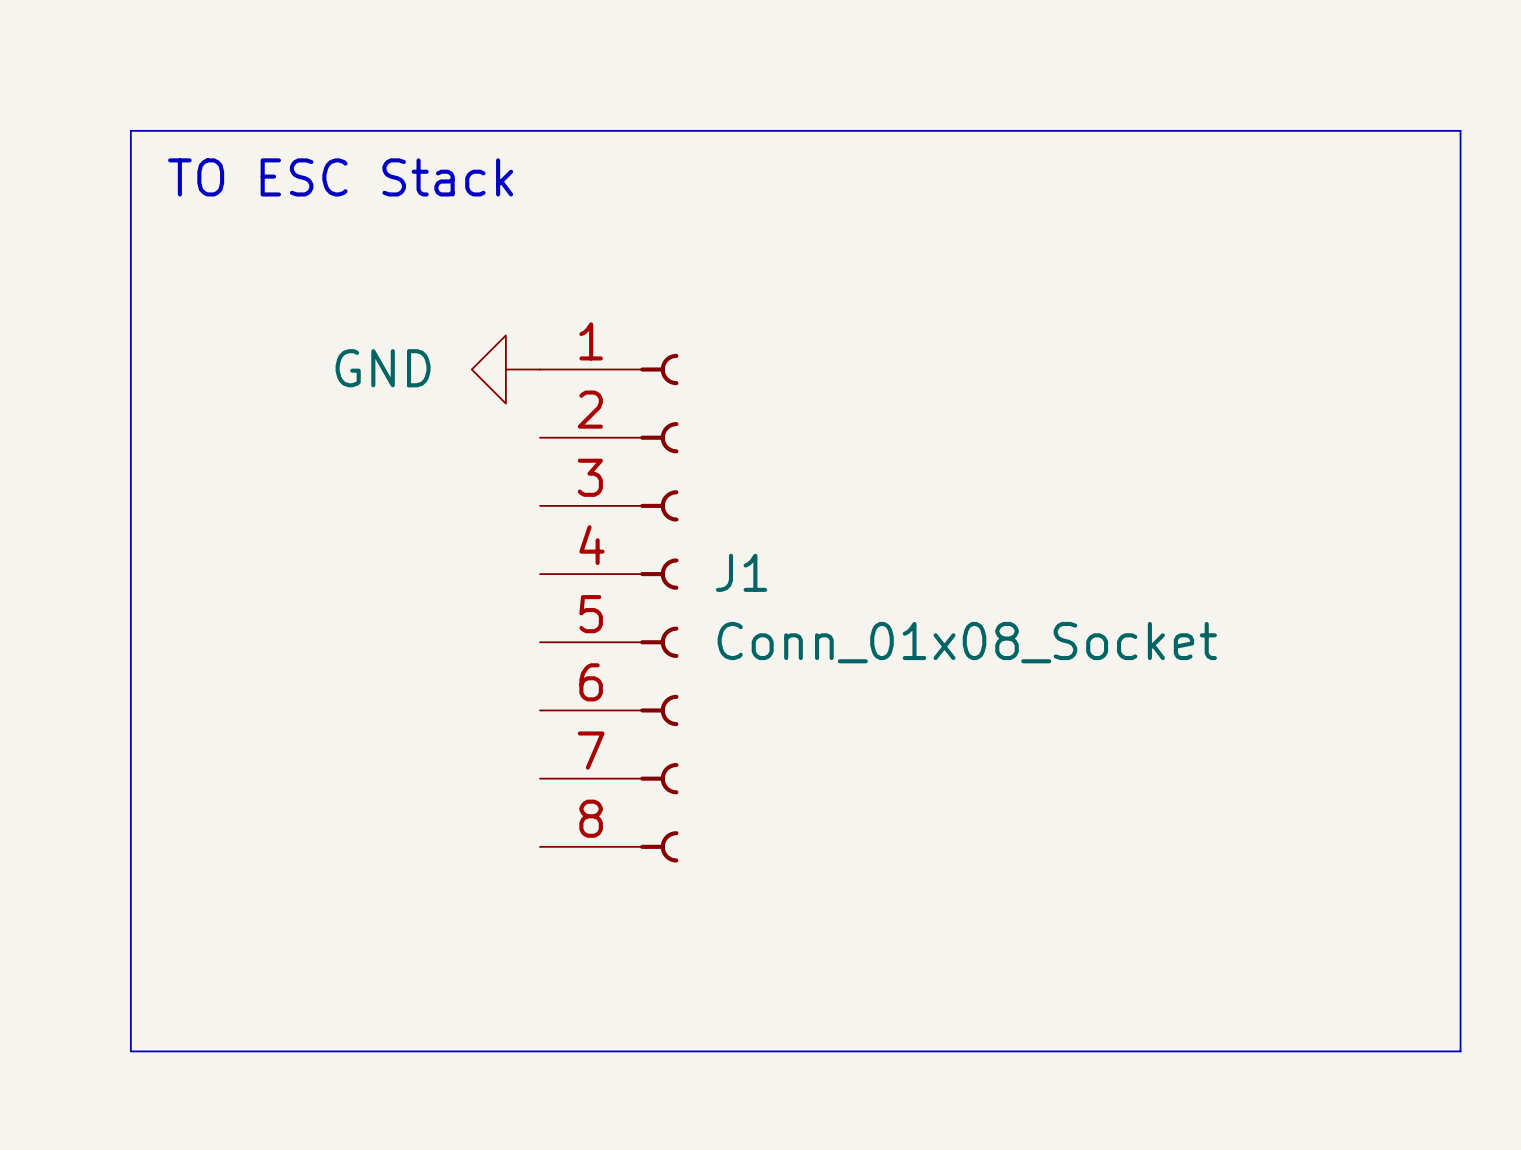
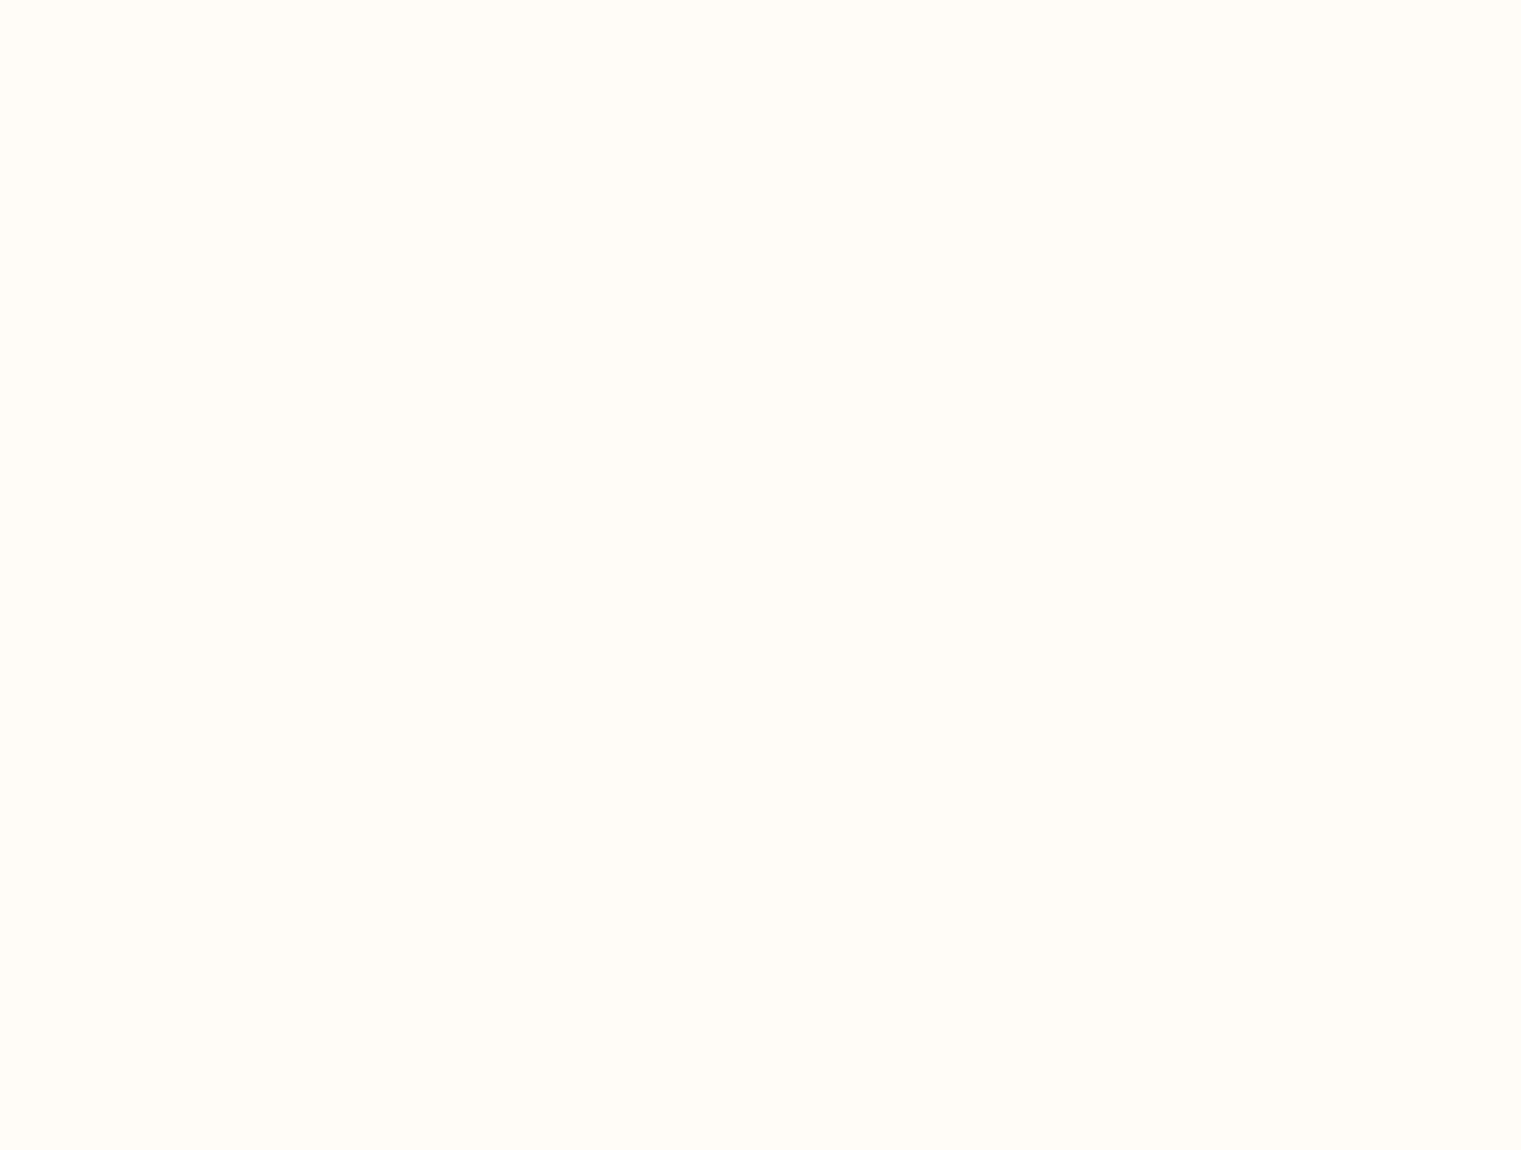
line: (130, 130) (1460, 130) (1460, 1051) (130, 1051) (130, 130) -> none
text: TO ESC Stack (340, 177) -> none
power symbol: GND (505, 369) -> none
J1: Conn_01x08_Socket (609, 608) -> none

